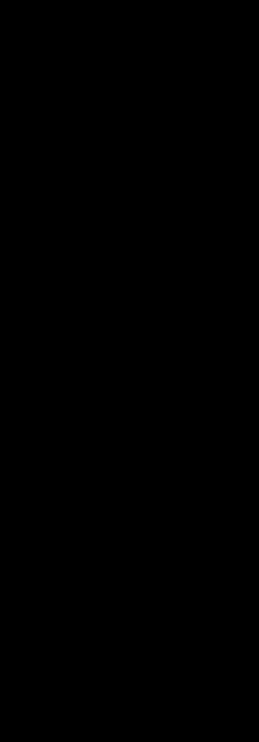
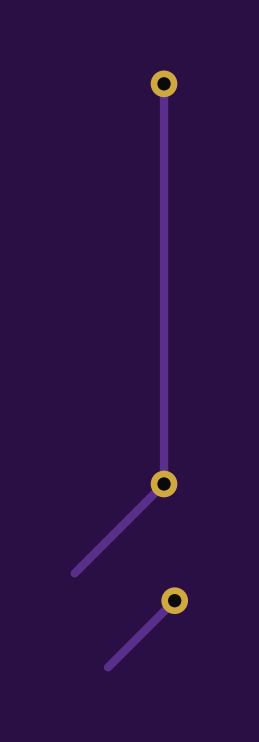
track: none -> (164, 83) (164, 483) (74, 573)
via: none -> (164, 83)
via: none -> (164, 483)
track: none -> (174, 600) (108, 667)
via: none -> (174, 600)

